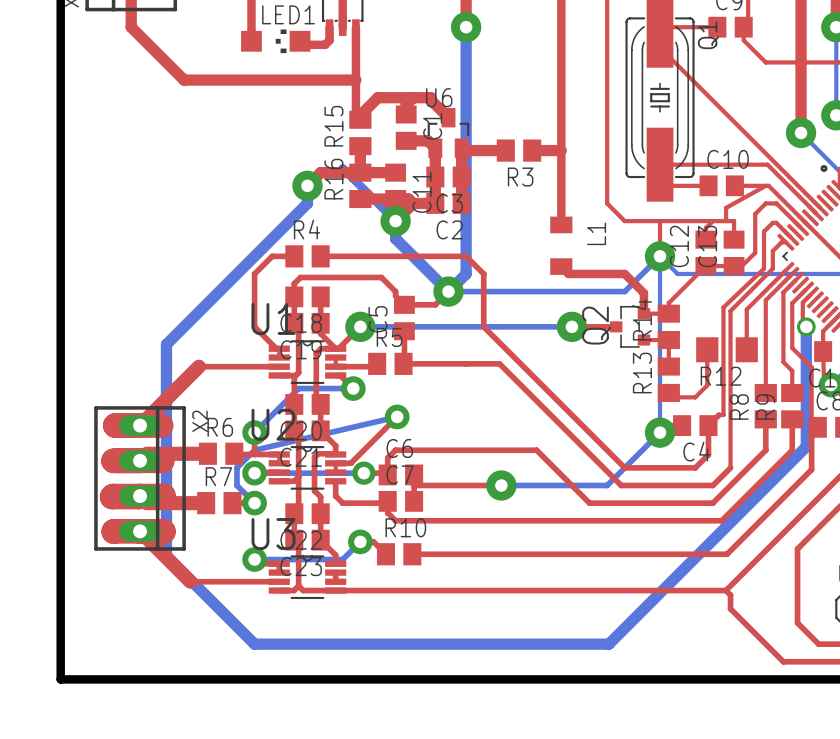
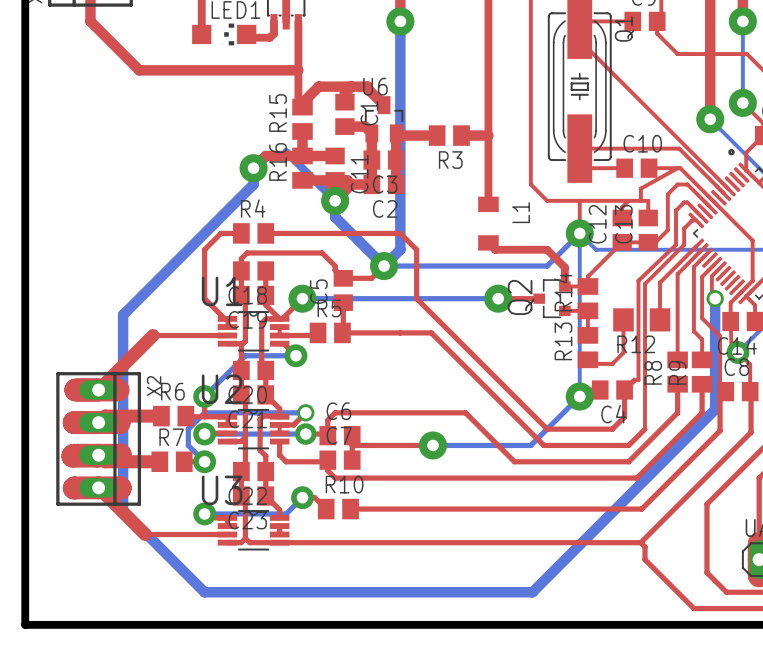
top track: (397, 416) (363, 450) -> none
bottom track: (397, 416) (254, 450) -> (305, 412) (204, 412)
via: (397, 416) -> none
via: none -> (305, 412)

